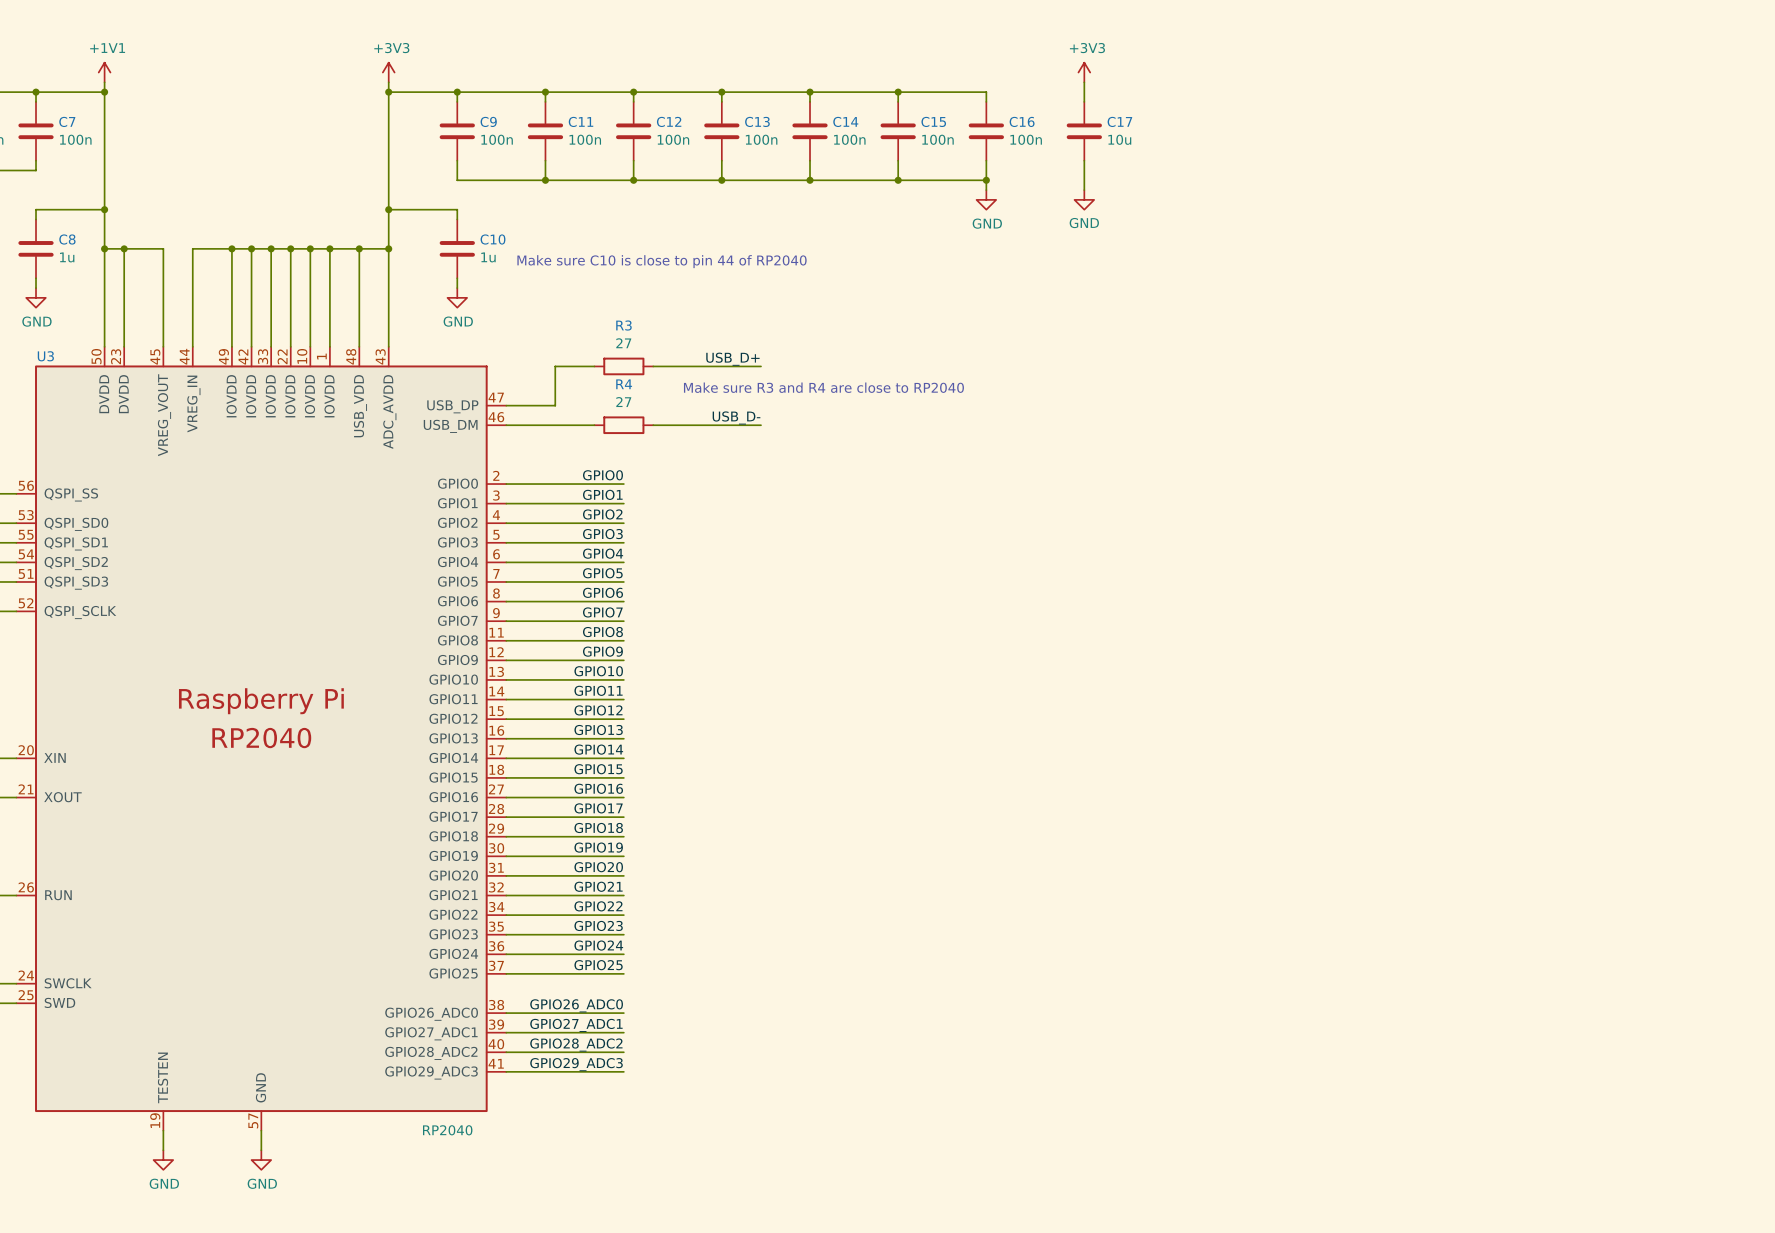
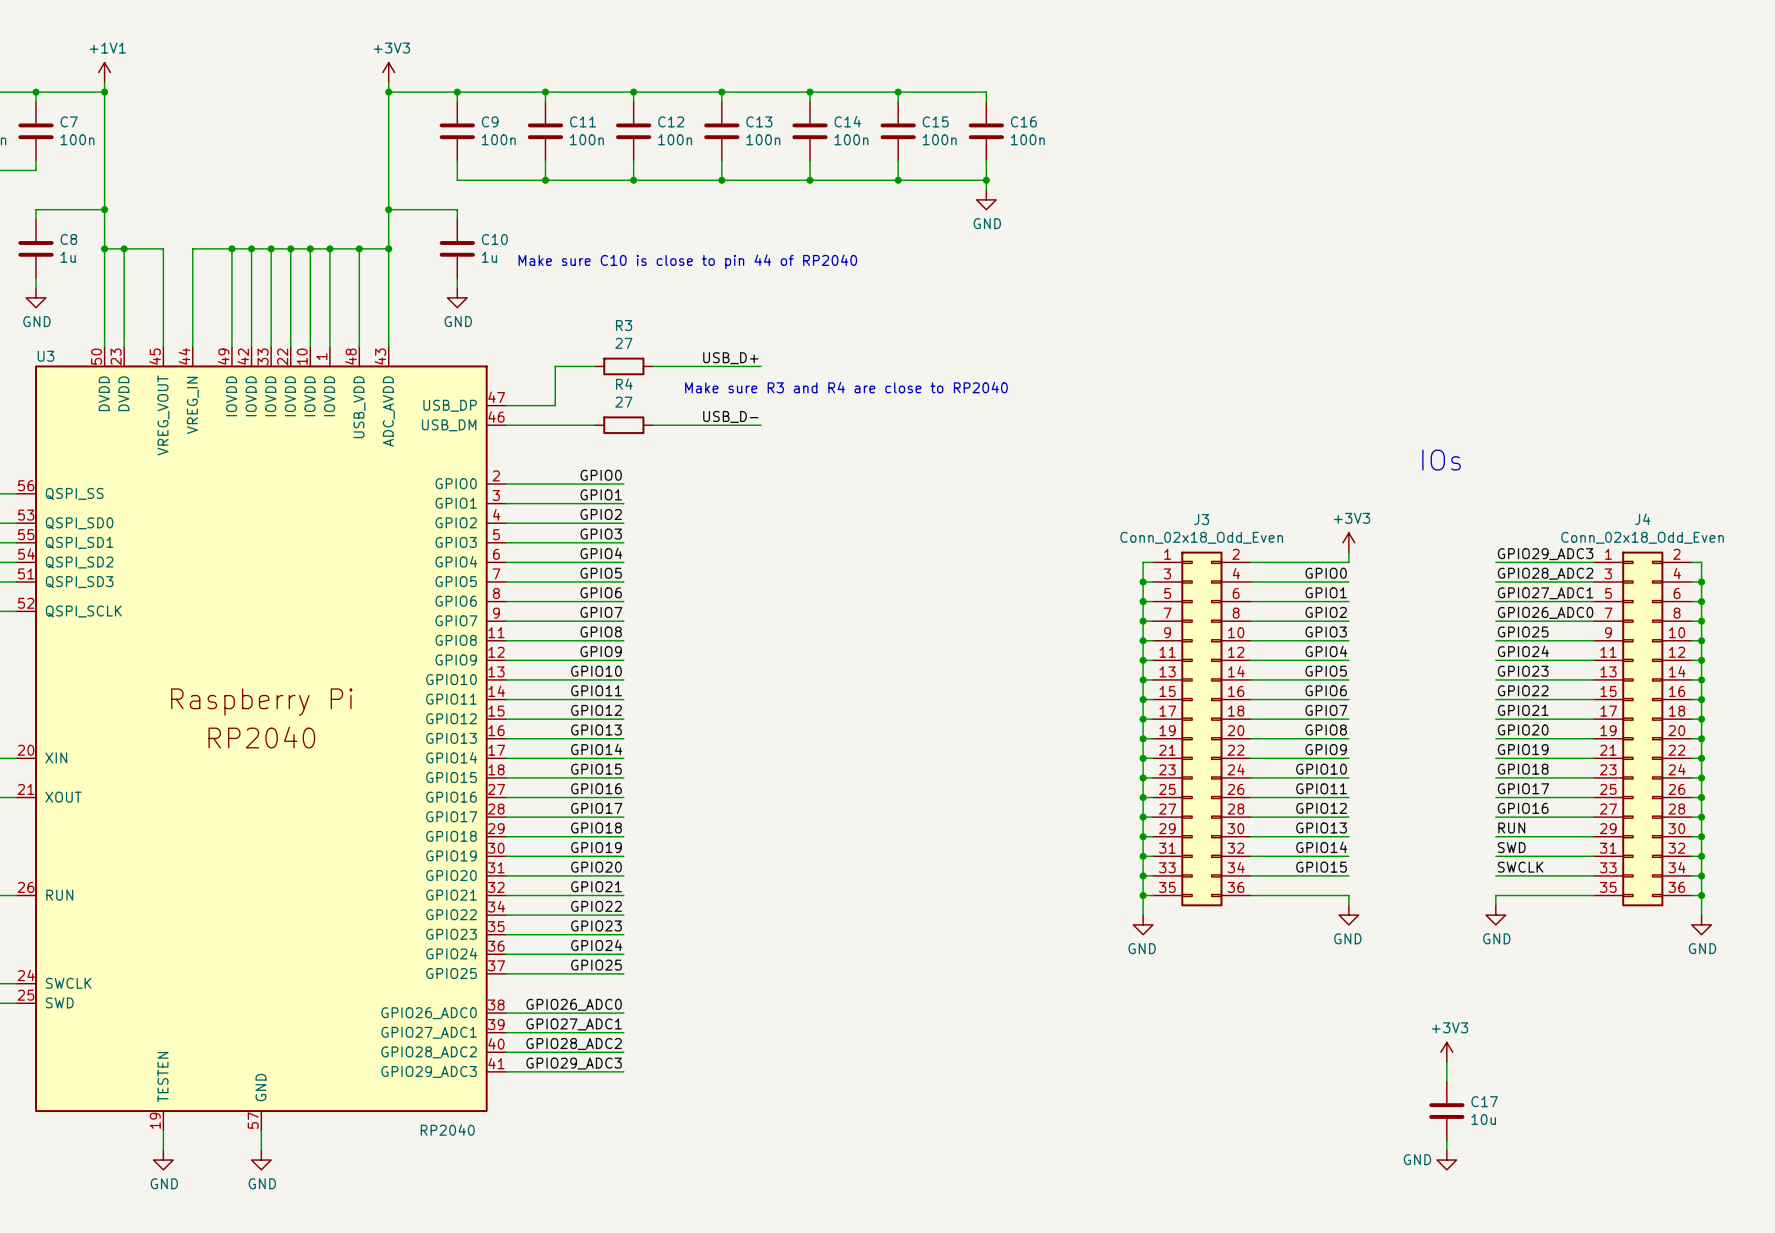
power symbol: +3V3 (1084, 72) -> none
wire: (1084, 82) (1084, 101) -> none
C17 position: (1084, 131) -> (1446, 1111)
wire: (1084, 160) (1084, 190) -> none
power symbol: GND (1084, 199) -> none
text: none -> IOs (1441, 460)
power symbol: none -> +3V3 (1348, 542)
wire: none -> (1348, 552) (1348, 562) (1250, 562)
label: none -> GPIO29_ADC3 (1545, 554)
wire: none -> (1152, 562) (1143, 562) (1143, 915)
wire: none -> (1495, 562) (1593, 562)
wire: none -> (1691, 562) (1701, 562) (1701, 915)
label: none -> GPIO0 (1326, 573)
label: none -> GPIO28_ADC2 (1545, 573)
wire: none -> (1143, 581) (1152, 581)
junction: none -> (1143, 581)
wire: none -> (1250, 581) (1348, 581)
wire: none -> (1495, 581) (1593, 581)
wire: none -> (1691, 581) (1701, 581)
junction: none -> (1701, 581)
label: none -> GPIO1 (1326, 592)
label: none -> GPIO27_ADC1 (1545, 593)
wire: none -> (1143, 601) (1152, 601)
junction: none -> (1143, 601)
wire: none -> (1250, 601) (1348, 601)
wire: none -> (1495, 601) (1593, 601)
wire: none -> (1691, 601) (1701, 601)
junction: none -> (1701, 601)
label: none -> GPIO2 (1326, 612)
label: none -> GPIO26_ADC0 (1545, 612)
wire: none -> (1143, 621) (1152, 621)
junction: none -> (1143, 621)
wire: none -> (1250, 621) (1348, 621)
wire: none -> (1495, 621) (1593, 621)
wire: none -> (1691, 621) (1701, 621)
junction: none -> (1701, 621)
label: none -> GPIO3 (1326, 632)
label: none -> GPIO25 (1523, 632)
wire: none -> (1143, 640) (1152, 640)
junction: none -> (1143, 640)
wire: none -> (1250, 640) (1348, 640)
wire: none -> (1495, 640) (1593, 640)
wire: none -> (1691, 640) (1701, 640)
junction: none -> (1701, 640)
label: none -> GPIO4 (1326, 651)
label: none -> GPIO24 (1523, 651)
wire: none -> (1143, 660) (1152, 660)
junction: none -> (1143, 660)
wire: none -> (1250, 660) (1348, 660)
wire: none -> (1495, 660) (1593, 660)
wire: none -> (1691, 660) (1701, 660)
junction: none -> (1701, 660)
label: none -> GPIO5 (1326, 671)
label: none -> GPIO23 (1523, 671)
wire: none -> (1143, 679) (1152, 679)
junction: none -> (1143, 679)
wire: none -> (1250, 679) (1348, 679)
wire: none -> (1495, 679) (1593, 679)
wire: none -> (1691, 679) (1701, 679)
junction: none -> (1701, 679)
label: none -> GPIO6 (1326, 690)
label: none -> GPIO22 (1523, 690)
wire: none -> (1143, 699) (1152, 699)
junction: none -> (1143, 699)
wire: none -> (1250, 699) (1348, 699)
wire: none -> (1495, 699) (1593, 699)
wire: none -> (1691, 699) (1701, 699)
junction: none -> (1701, 699)
label: none -> GPIO7 (1326, 710)
label: none -> GPIO21 (1523, 710)
wire: none -> (1143, 719) (1152, 719)
junction: none -> (1143, 719)
wire: none -> (1250, 719) (1348, 719)
wire: none -> (1495, 719) (1593, 719)
wire: none -> (1691, 719) (1701, 719)
junction: none -> (1701, 719)
J3: none -> Conn_02x18_Odd_Even (1201, 728)
J4: none -> Conn_02x18_Odd_Even (1642, 728)
label: none -> GPIO8 (1326, 730)
label: none -> GPIO20 (1523, 730)
wire: none -> (1143, 738) (1152, 738)
junction: none -> (1143, 738)
wire: none -> (1250, 738) (1348, 738)
wire: none -> (1495, 738) (1593, 738)
wire: none -> (1691, 738) (1701, 738)
junction: none -> (1701, 738)
label: none -> GPIO9 (1326, 749)
label: none -> GPIO19 (1523, 749)
wire: none -> (1143, 758) (1152, 758)
junction: none -> (1143, 758)
wire: none -> (1250, 758) (1348, 758)
wire: none -> (1495, 758) (1593, 758)
wire: none -> (1691, 758) (1701, 758)
junction: none -> (1701, 758)
label: none -> GPIO10 (1321, 769)
label: none -> GPIO18 (1523, 769)
wire: none -> (1143, 777) (1152, 777)
junction: none -> (1143, 777)
wire: none -> (1250, 777) (1348, 777)
wire: none -> (1495, 777) (1593, 777)
wire: none -> (1691, 777) (1701, 777)
junction: none -> (1701, 777)
label: none -> GPIO11 (1321, 788)
label: none -> GPIO17 (1523, 788)
wire: none -> (1143, 797) (1152, 797)
junction: none -> (1143, 797)
wire: none -> (1250, 797) (1348, 797)
wire: none -> (1495, 797) (1593, 797)
wire: none -> (1691, 797) (1701, 797)
junction: none -> (1701, 797)
label: none -> GPIO12 (1321, 808)
label: none -> GPIO16 (1523, 808)
wire: none -> (1143, 817) (1152, 817)
junction: none -> (1143, 817)
wire: none -> (1250, 817) (1348, 817)
wire: none -> (1495, 817) (1593, 817)
wire: none -> (1691, 817) (1701, 817)
junction: none -> (1701, 817)
label: none -> GPIO13 (1321, 827)
label: none -> RUN (1511, 827)
wire: none -> (1143, 836) (1152, 836)
junction: none -> (1143, 836)
wire: none -> (1250, 836) (1348, 836)
wire: none -> (1495, 836) (1593, 836)
wire: none -> (1691, 836) (1701, 836)
junction: none -> (1701, 836)
label: none -> GPIO14 (1321, 847)
label: none -> SWD (1511, 847)
wire: none -> (1143, 856) (1152, 856)
junction: none -> (1143, 856)
wire: none -> (1250, 856) (1348, 856)
wire: none -> (1495, 856) (1593, 856)
wire: none -> (1691, 856) (1701, 856)
junction: none -> (1701, 856)
label: none -> GPIO15 (1321, 867)
label: none -> SWCLK (1520, 867)
wire: none -> (1143, 875) (1152, 875)
junction: none -> (1143, 875)
wire: none -> (1250, 875) (1348, 875)
wire: none -> (1495, 875) (1593, 875)
wire: none -> (1691, 875) (1701, 875)
junction: none -> (1701, 875)
wire: none -> (1143, 895) (1152, 895)
junction: none -> (1143, 895)
wire: none -> (1250, 895) (1348, 895) (1348, 905)
wire: none -> (1593, 895) (1495, 895) (1495, 905)
wire: none -> (1691, 895) (1701, 895)
junction: none -> (1701, 895)
power symbol: none -> GND (1348, 915)
power symbol: none -> GND (1495, 915)
power symbol: none -> GND (1143, 924)
power symbol: none -> GND (1701, 924)
power symbol: none -> +3V3 (1446, 1052)
wire: none -> (1446, 1062) (1446, 1081)
wire: none -> (1446, 1140) (1446, 1150)
power symbol: none -> GND (1446, 1160)

